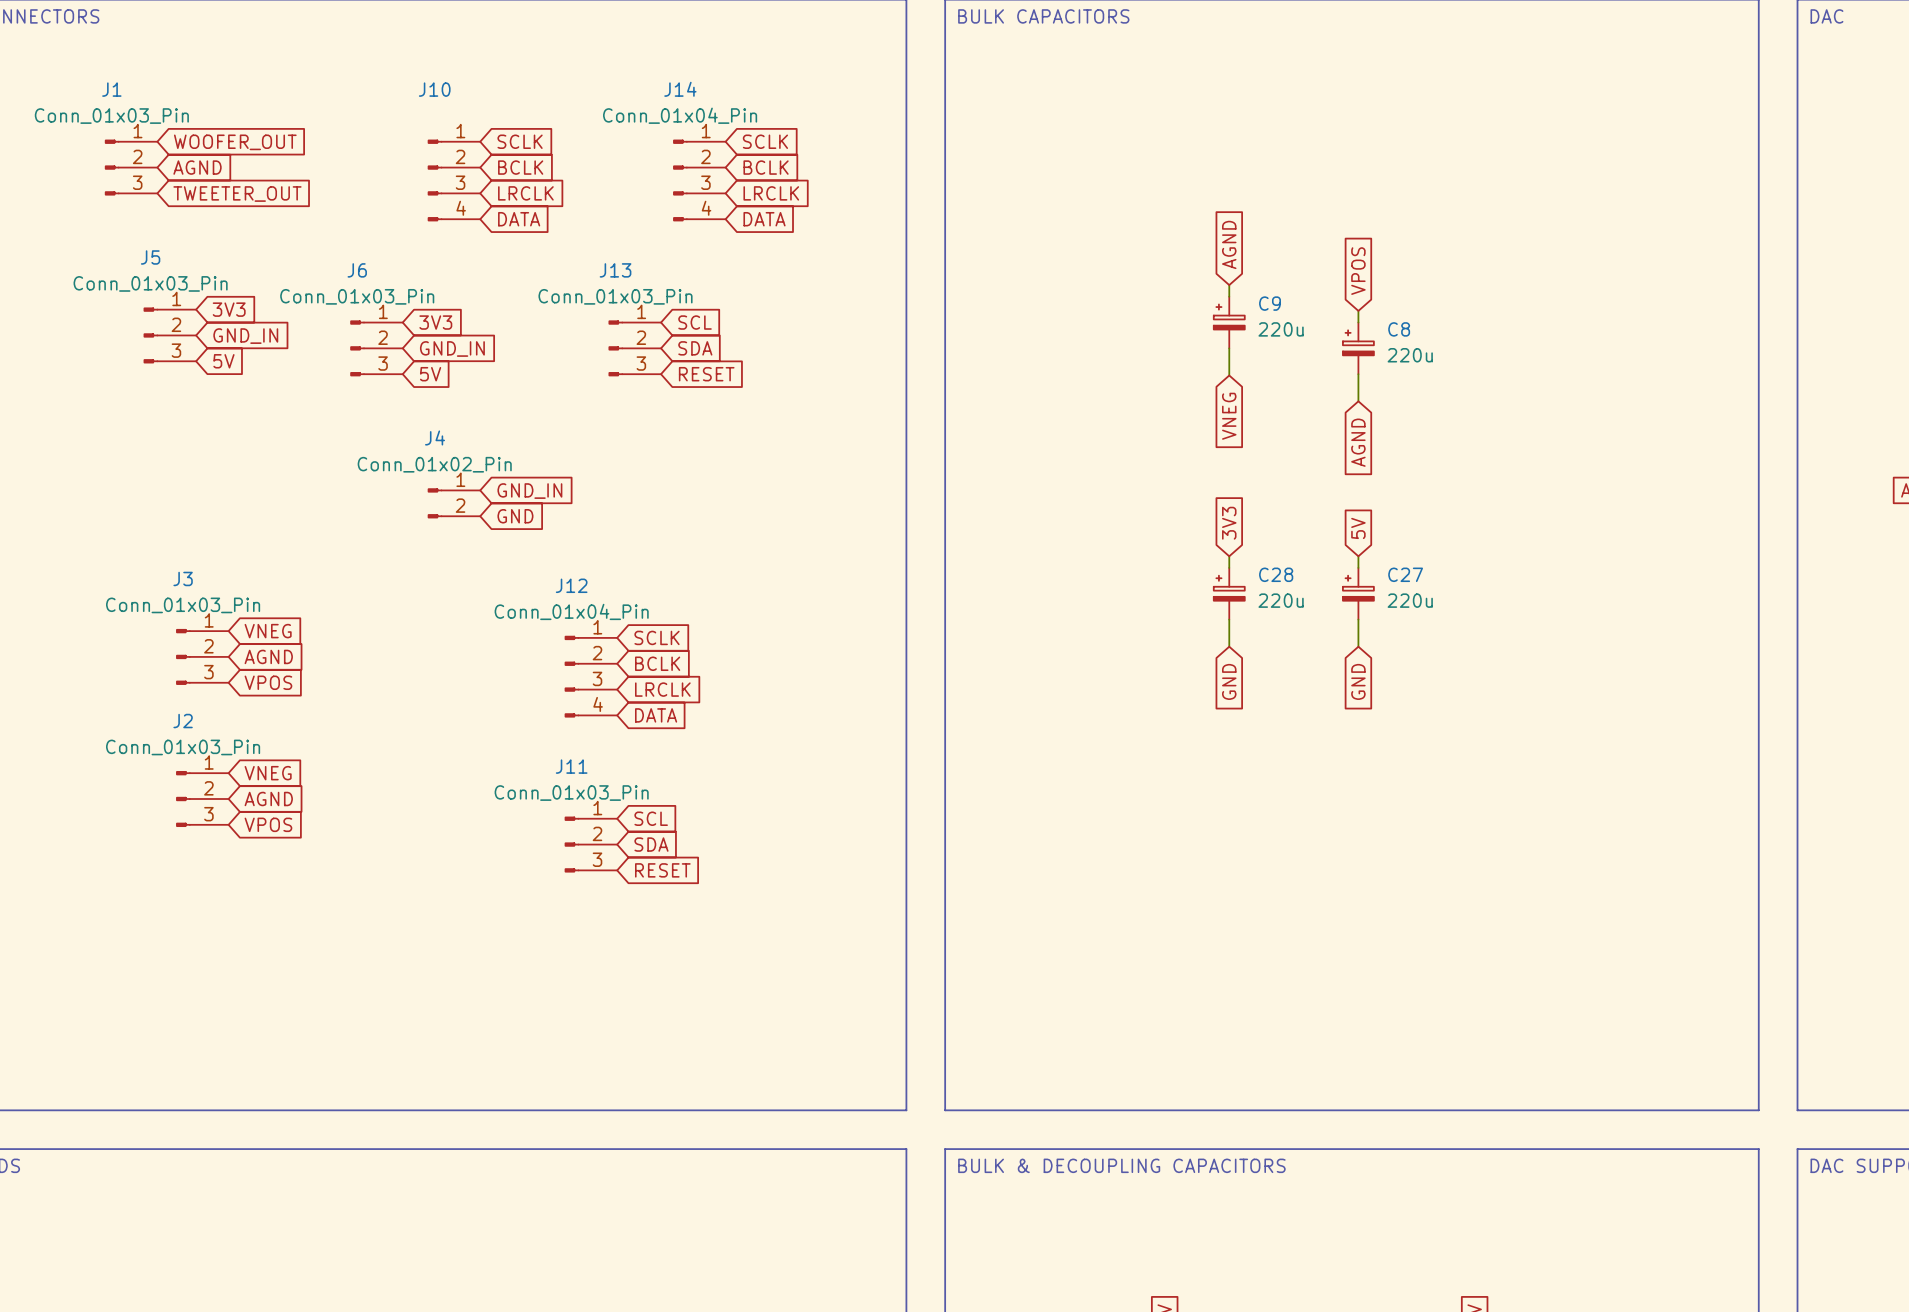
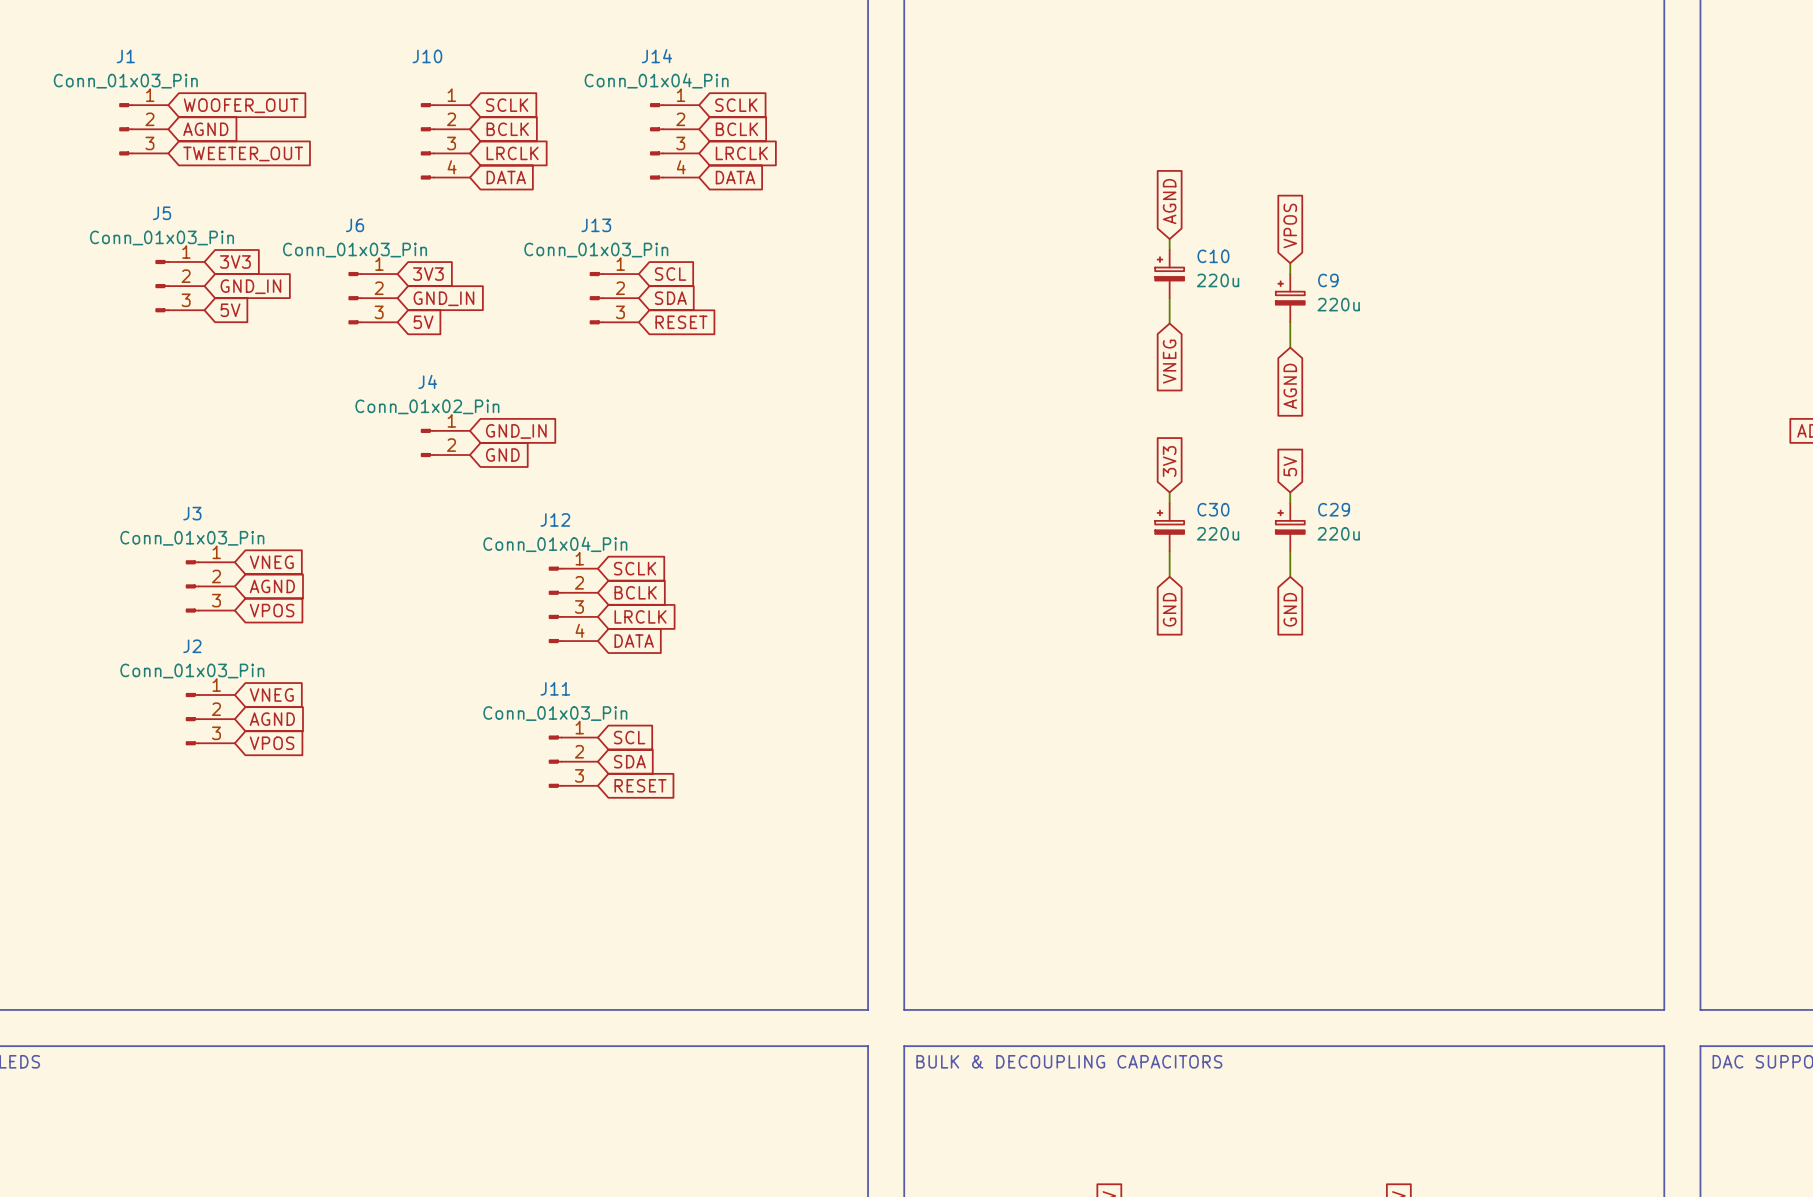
C9 name: C9 (1270, 303) -> C10 (1213, 256)
C8 name: C8 (1399, 329) -> C9 (1328, 280)
C28 name: C28 (1276, 574) -> C30 (1213, 509)
C27 name: C27 (1405, 574) -> C29 (1334, 509)

